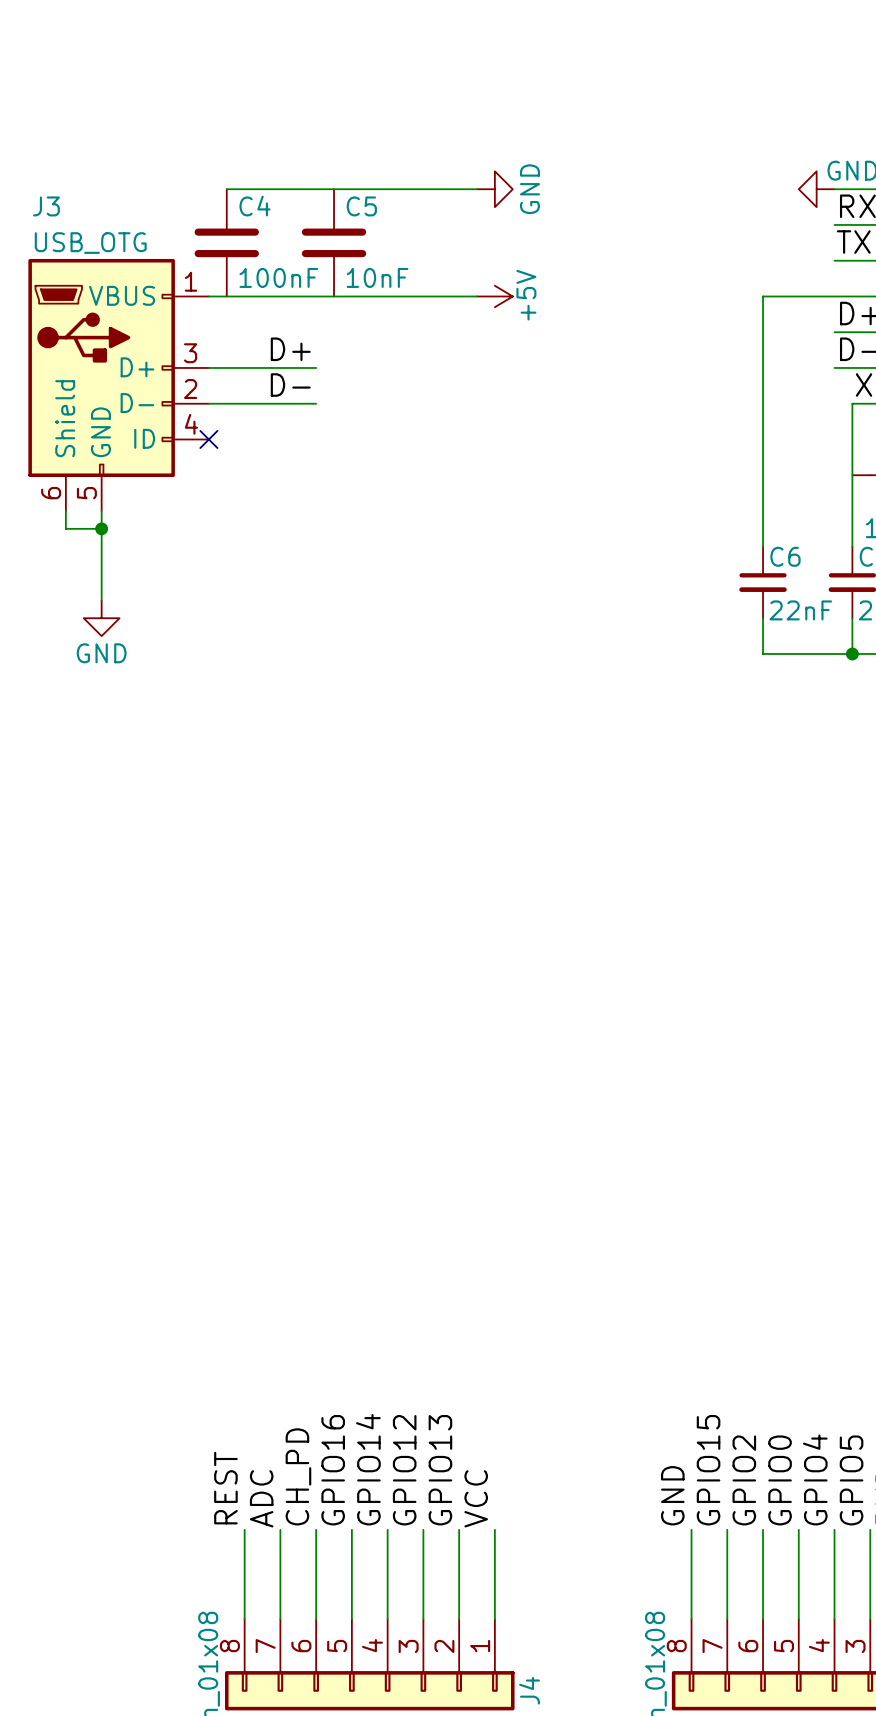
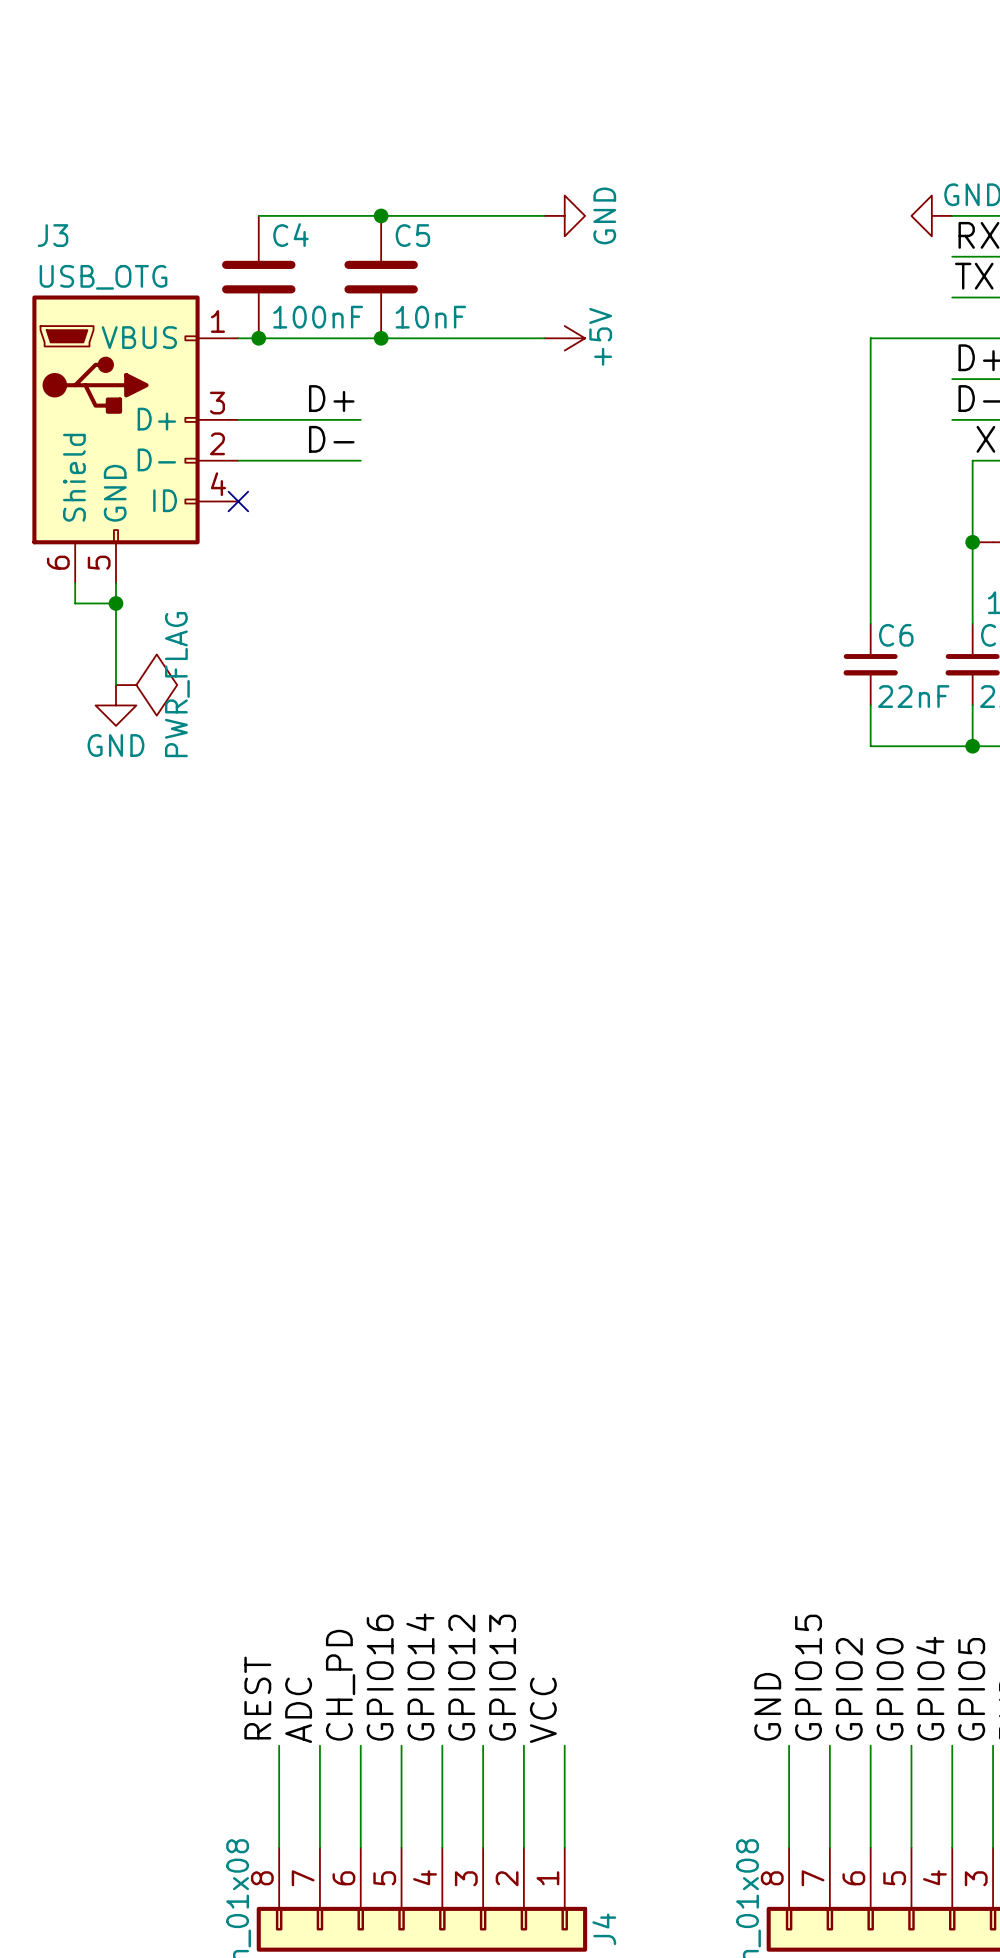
junction: none -> (381, 215)
junction: none -> (258, 338)
junction: none -> (381, 338)
junction: none -> (972, 542)
power symbol: none -> PWR_FLAG (146, 685)

